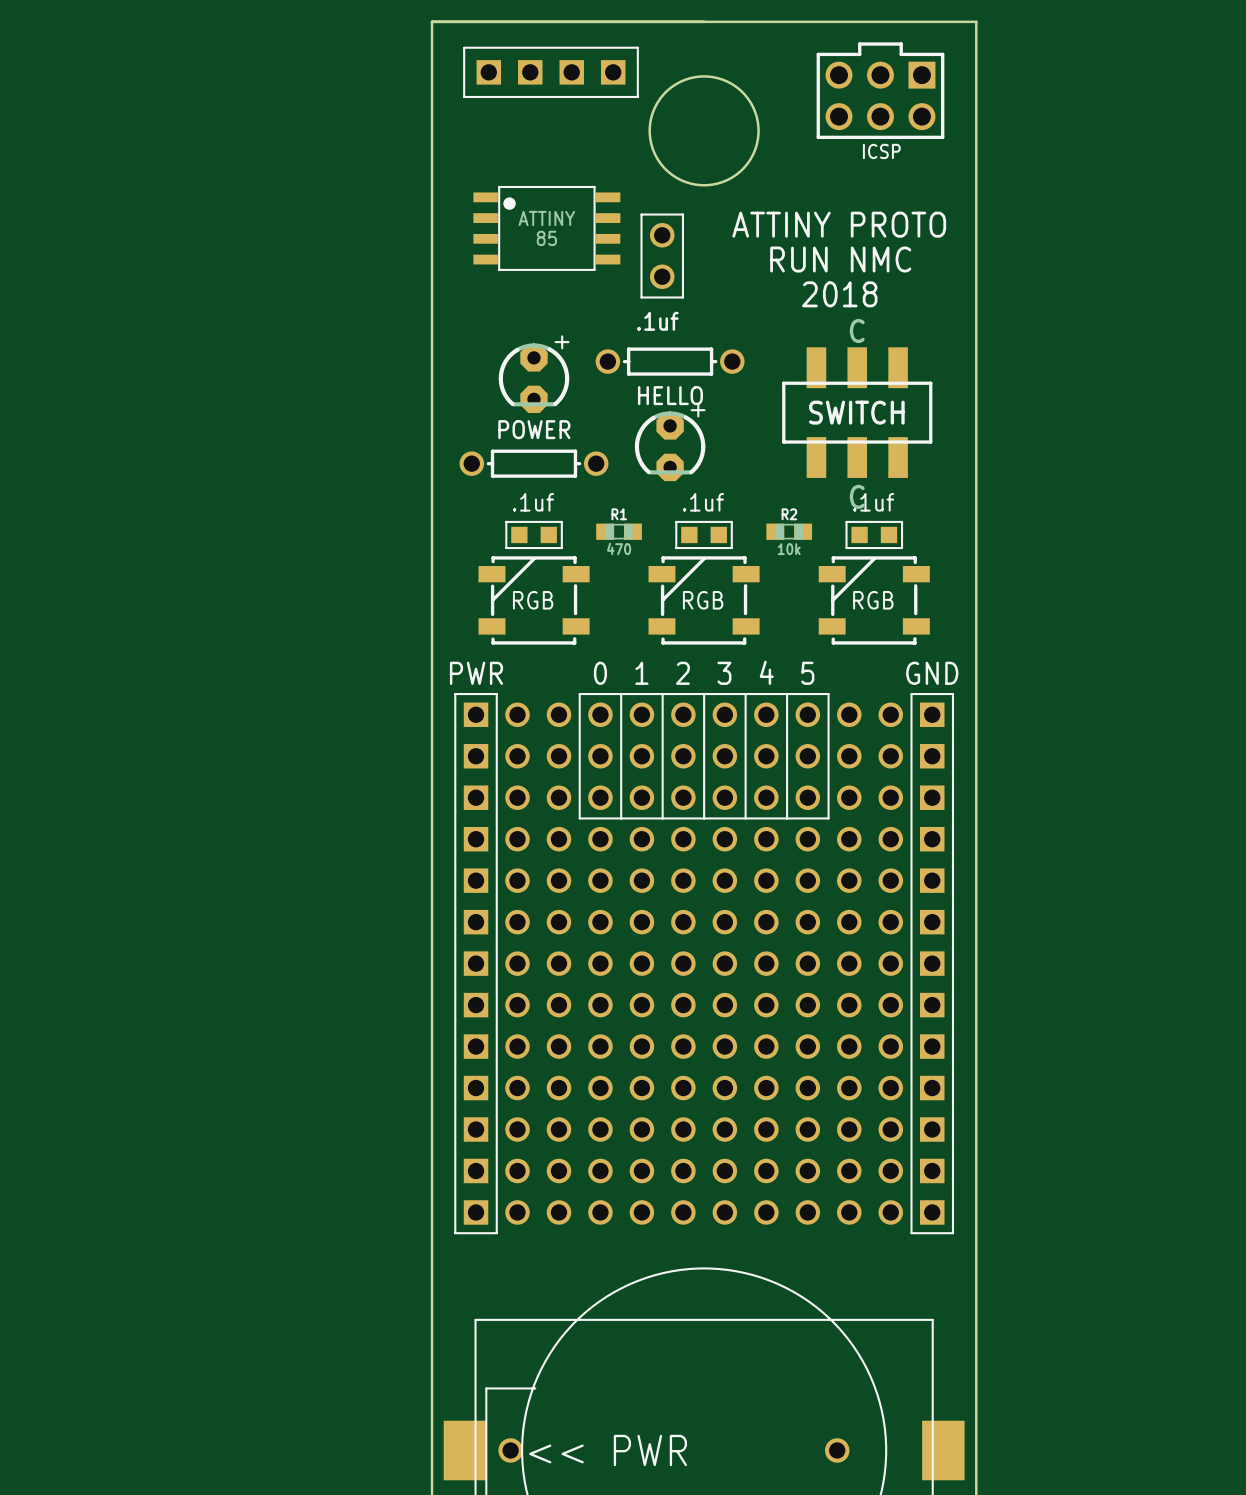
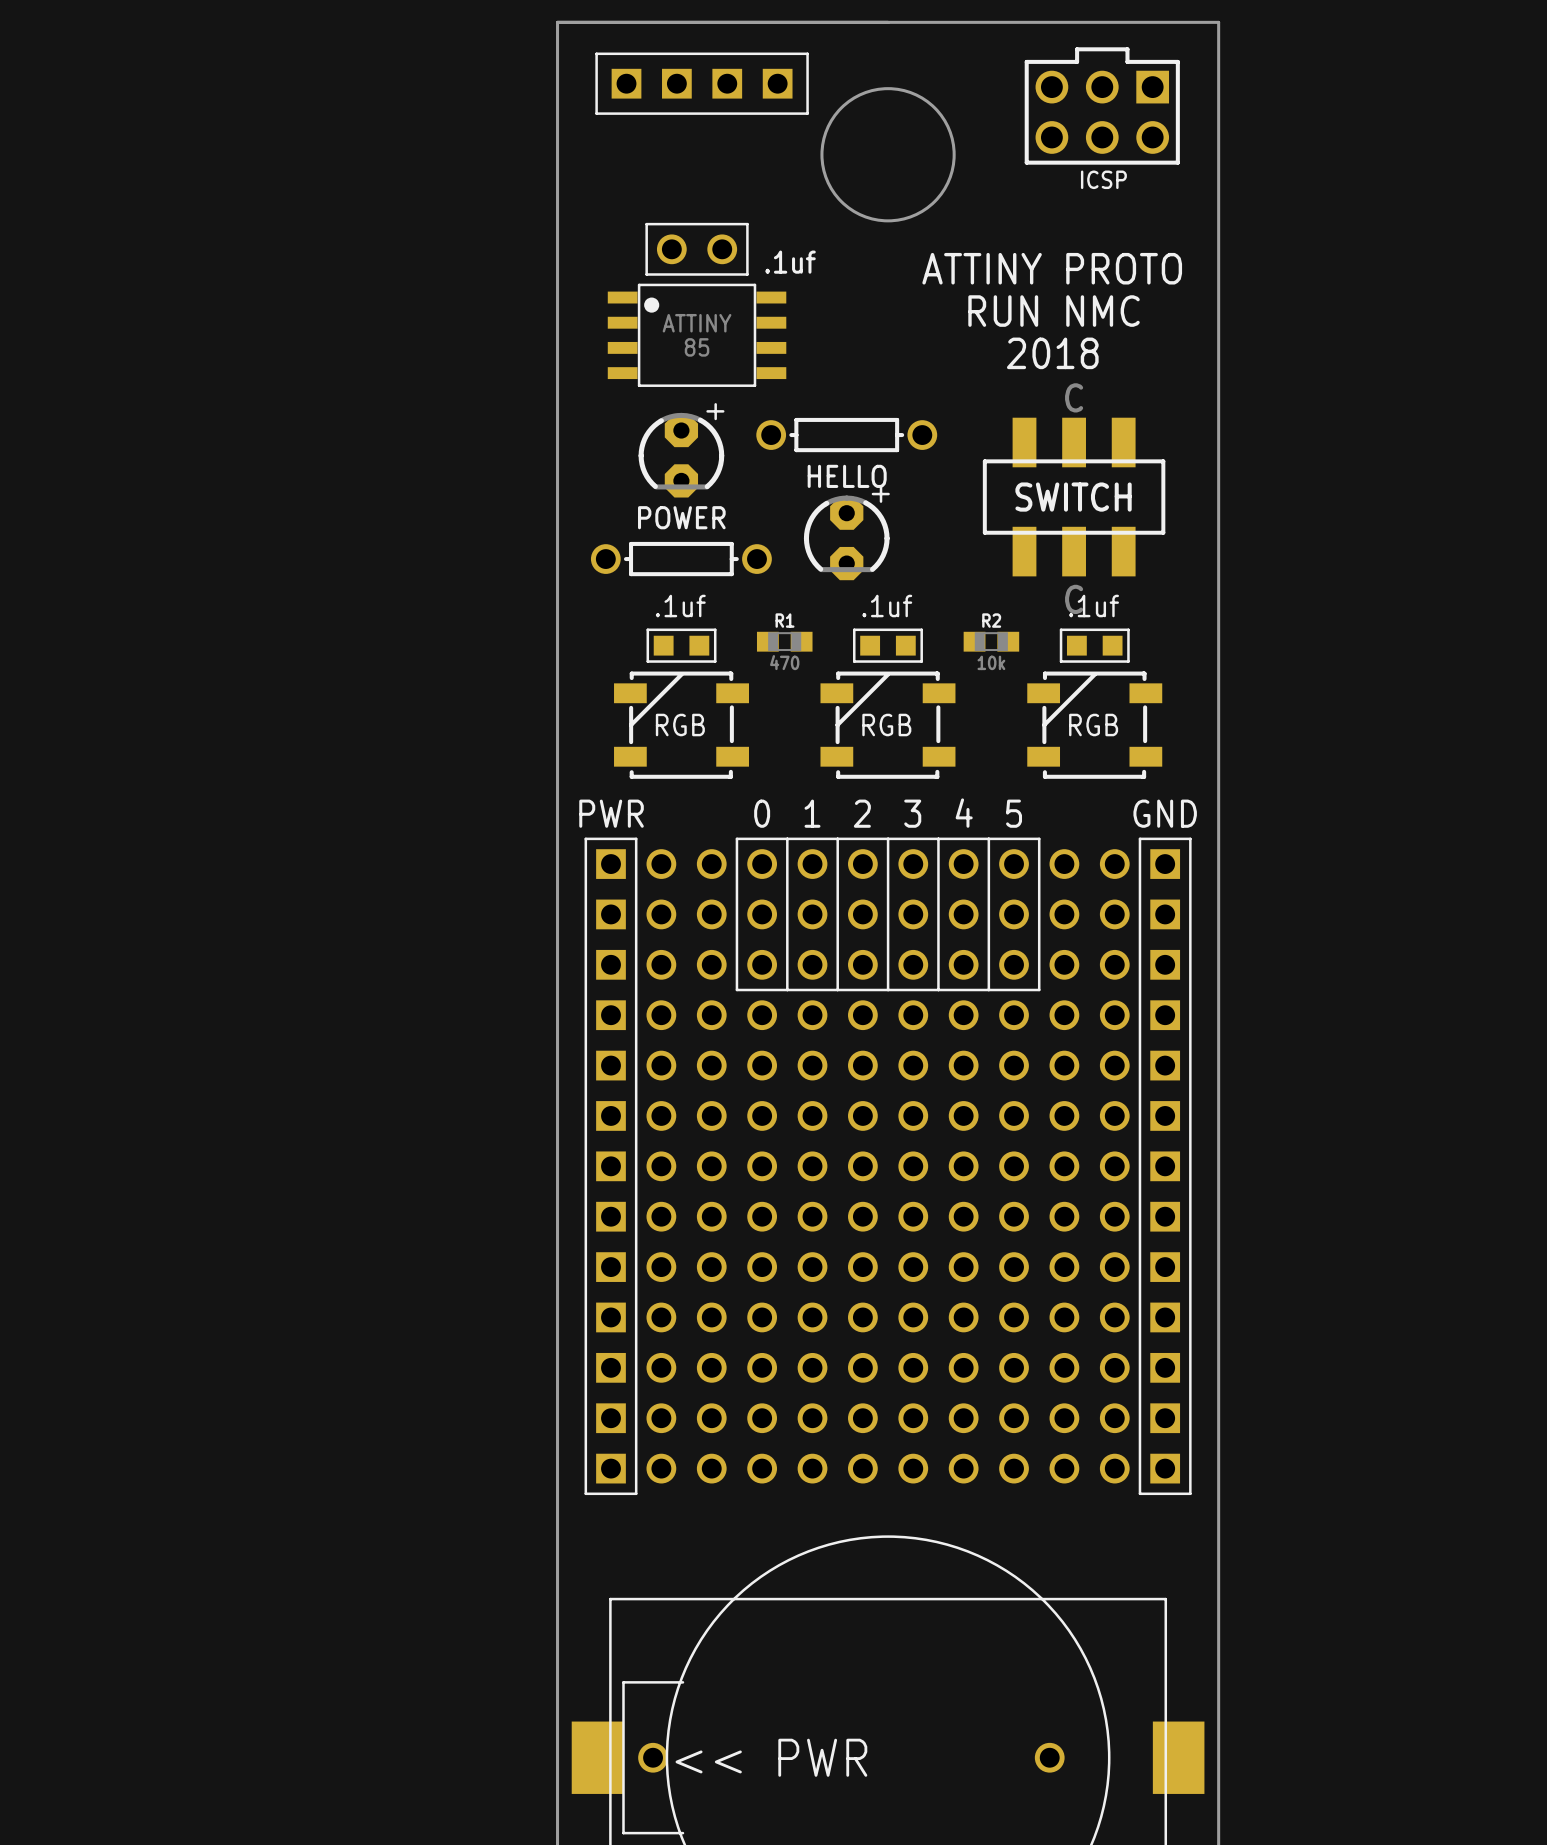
part position: (546, 228) -> (697, 335)
part rotation: 0° (662, 256) -> 90° clockwise (697, 249)
part position: (662, 256) -> (697, 249)
text position: .1uf (657, 321) -> .1uf (790, 262)

